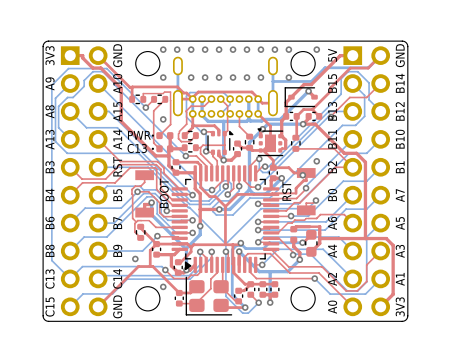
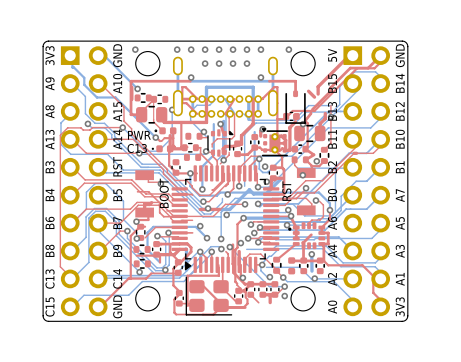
via: none -> (135, 49)
via: (163, 49) -> none
via: (274, 49) -> none
via: (316, 49) -> none
top track: (70, 55) (82, 55) (92, 68) (100, 68) (121, 88) (121, 121) (155, 155) (168, 155) -> none
bottom track: none -> (72, 55) (72, 67) (84, 77) (84, 84) (96, 97) (115, 97) (155, 137)
top track: (98, 55) (129, 87) (177, 86) (192, 98) (198, 92) (251, 92) (262, 103) (272, 103) -> none
bottom track: none -> (100, 55) (104, 55) (137, 88)
top track: (349, 55) (340, 55) (311, 84) (304, 84) (286, 102) (286, 116) (281, 120) (281, 136) -> (349, 55) (318, 86) (318, 94)
bottom track: (380, 55) (368, 67) (325, 67) (311, 81) (272, 81) -> none
top track: none -> (387, 55) (374, 68) (357, 68) (314, 110) (292, 110) (284, 119) (277, 119)
via: none -> (205, 63)
via: none -> (219, 63)
via: none -> (233, 63)
via: none -> (246, 63)
via: (163, 77) -> none
via: (205, 77) -> none
via: (219, 77) -> none
via: (233, 77) -> none
via: (246, 77) -> none
via: (288, 77) -> none
top track: none -> (190, 81) (131, 81) (131, 114) (141, 114)
bottom track: none -> (190, 81) (269, 81)
top track: none -> (269, 81) (295, 81) (295, 93)
bottom track: (70, 83) (55, 98) (55, 141) (67, 153) (138, 153) (189, 204) (209, 204) (225, 186) -> none
bottom track: none -> (72, 83) (85, 96) (85, 113) (95, 123) (104, 123) (114, 133) (114, 136) (142, 164) (162, 164) (199, 201) (203, 201)
bottom track: (98, 83) (204, 190) (212, 190) -> none
top track: none -> (100, 83) (123, 107) (123, 121) (131, 128) (131, 133) (167, 169) (167, 172) (175, 180) (186, 180) (199, 195) (209, 195) (224, 180) (224, 173)
bottom track: (352, 83) (364, 95) (364, 116) (355, 125) (342, 125) (269, 198) (249, 198) (232, 215) (216, 215) (213, 211) (213, 207) (219, 200) (229, 200) (239, 190) (239, 186) -> none
bottom track: none -> (359, 83) (359, 88) (292, 156) (260, 156)
top track: (380, 83) (366, 97) (349, 97) (331, 117) -> none
bottom track: none -> (387, 83) (375, 71) (354, 71) (339, 86) (339, 104) (332, 112) (306, 112) (295, 123) (255, 123) (244, 134) (244, 186)
via: none -> (137, 88)
bottom track: (308, 91) (280, 119) (261, 120) (248, 119) (246, 121) (208, 121) (202, 115) (202, 99) -> none
via: (308, 91) -> none
part footprint: [129, 94, 147, 105] -> [134, 92, 152, 103]
top track: none -> (148, 97) (153, 101) (153, 121) (162, 130)
part: (301, 97) -> none
top track: (143, 99) (143, 93) (170, 92) (170, 100) -> none
top track: (165, 99) (153, 110) (153, 143) (159, 148) -> none
top track: none -> (197, 99) (185, 87) (182, 87) (182, 103) (186, 103) (197, 113)
top track: none -> (206, 99) (206, 122) (164, 122) (161, 114)
bottom track: none -> (206, 99) (206, 87) (253, 87) (253, 99)
top track: (211, 99) (204, 106) (191, 106) (186, 111) (186, 124) (179, 131) (178, 138) (181, 141) (189, 141) (195, 135) -> none
bottom track: none -> (215, 99) (209, 105) (197, 105) (190, 111) (190, 120) (207, 137)
top track: (220, 99) (227, 105) (227, 130) (224, 133) (224, 152) -> none
bottom track: none -> (225, 99) (234, 113)
top track: none -> (234, 99) (225, 113) (229, 117) (229, 133)
top track: none -> (253, 99) (253, 124) (241, 135) (241, 144) (225, 146) (223, 153)
top track: none -> (262, 99) (274, 87) (277, 87) (277, 134) (274, 136) (274, 143) (284, 143)
top track: (170, 100) (170, 124) (159, 135) -> none
top track: none -> (330, 105) (330, 143) (324, 149)
bottom track: none -> (330, 105) (308, 105) (294, 120) (250, 120) (243, 113)
bottom track: (145, 107) (106, 68) (68, 68) (51, 85) (51, 260) (70, 278) (82, 266) (161, 266) (165, 270) -> none
via: (145, 107) -> none
part: none -> (295, 107)
bottom track: none -> (172, 109) (172, 137) (158, 151) (146, 151) (122, 127)
via: none -> (172, 109)
top track: none -> (311, 110) (305, 120) (307, 123) (307, 146) (305, 149) (313, 154) (305, 159) (311, 165) (311, 173)
bottom track: (70, 111) (86, 127) (117, 127) (190, 200) (208, 200) (219, 190) (219, 183) (223, 180) (228, 180) (231, 183) (231, 190) (227, 194) -> none
bottom track: none -> (72, 111) (60, 122) (60, 144) (70, 154) (107, 154) (123, 170) (160, 170) (204, 214) (210, 214) (222, 202) (222, 198)
bottom track: (98, 111) (108, 111) (192, 195) -> none
bottom track: (380, 111) (369, 99) (369, 82) (357, 71) (348, 71) (341, 78) (341, 94) (268, 166) (265, 166) -> none
bottom track: none -> (387, 111) (370, 127) (328, 127) (269, 187) (259, 186)
top track: (192, 113) (192, 127) (184, 135) -> none
bottom track: (220, 113) (230, 104) (230, 99) (223, 92) (190, 92) (186, 96) (186, 117) (201, 131) (206, 134) (206, 151) -> none
bottom track: none -> (225, 113) (225, 151) (217, 160)
top track: none -> (234, 113) (234, 136) (231, 138) (217, 138) (212, 143) (212, 147)
top track: (239, 113) (239, 126) (249, 136) -> none
top track: (258, 113) (270, 126) (270, 143) (263, 150) -> none
top track: none -> (325, 113) (325, 118) (320, 123) (320, 133)
part: none -> (151, 114)
top track: (308, 116) (303, 124) (315, 124) (344, 153) (354, 153) -> (272, 205) (285, 205) (297, 192) (314, 192) (354, 153)
part: (313, 116) -> none
top track: (319, 116) (312, 109) (303, 109) (296, 116) (295, 137) -> none
bottom track: (331, 117) (328, 117) (258, 187) -> none
via: (163, 119) -> none
top track: none -> (295, 121) (289, 127) (289, 150) (284, 150)
top track: none -> (181, 122) (181, 147) (187, 147)
via: none -> (87, 123)
bottom track: none -> (213, 124) (213, 155) (202, 166) (202, 189)
top track: none -> (220, 124) (223, 132)
via: none -> (220, 124)
bottom track: (303, 124) (267, 124) (249, 142) (249, 189) -> none
top track: (192, 125) (214, 125) (218, 132) -> none
top track: none -> (122, 127) (92, 127) (90, 130) (67, 127) (60, 135) (60, 266) (72, 278)
via: none -> (122, 127)
part footprint: [257, 128, 284, 157] -> [261, 128, 288, 157]
top track: none -> (173, 130) (174, 146) (169, 152) (169, 165) (176, 173) (196, 173)
part footprint: [181, 130, 199, 141] -> [185, 132, 203, 140]
top track: (203, 131) (212, 133) -> none
part footprint: [151, 132, 174, 140] -> [154, 127, 177, 135]
bottom track: none -> (254, 132) (254, 169)
part footprint: [244, 133, 255, 151] -> [249, 133, 260, 151]
part: none -> (309, 133)
part footprint: [291, 134, 301, 152] -> [291, 144, 309, 154]
top track: none -> (199, 136) (207, 137)
top track: none -> (155, 137) (160, 141) (164, 138) (173, 138)
via: none -> (155, 137)
bottom track: (70, 139) (58, 127) (58, 106) (67, 97) (73, 97) (84, 86) (84, 80) (93, 71) (102, 71) (185, 156) -> none
top track: none -> (72, 139) (86, 153) (139, 153)
top track: (98, 139) (120, 161) (157, 161) (163, 168) (163, 173) (179, 188) -> none
top track: none -> (100, 139) (133, 139) (163, 169) (163, 174) (178, 188) (181, 188)
bottom track: (352, 139) (306, 188) -> none
top track: none -> (359, 139) (359, 143) (322, 180) (305, 180) (286, 199) (272, 199)
top track: (237, 143) (241, 147) (263, 150) -> none
top track: (224, 145) (203, 145) (200, 147) -> none
top track: (170, 148) (168, 165) (176, 172) (195, 173) (195, 188) (200, 193) (200, 226) -> none
top track: (295, 148) (334, 148) (352, 167) (335, 167) (300, 202) (294, 202) (286, 210) (272, 210) -> none
top track: (263, 150) (273, 160) (273, 167) (274, 167) -> none
top track: none -> (229, 152) (229, 155) (220, 163)
bottom track: none -> (139, 153) (205, 154)
via: none -> (139, 153)
top track: (218, 153) (223, 160) (231, 160) (237, 154) -> none
top track: (356, 153) (365, 162) (365, 238) -> (356, 153) (373, 153) (387, 139)
top track: none -> (241, 154) (247, 154) (254, 147) (260, 147) (262, 149) (274, 149) (282, 157) (283, 194) (272, 194)
part: none -> (324, 155)
top track: (185, 156) (196, 156) (206, 165) (206, 173) -> none
via: (185, 156) -> none
top track: none -> (260, 156) (251, 156) (240, 166) (240, 173)
part: none -> (192, 157)
top track: none -> (294, 159) (294, 165) (297, 168)
part: none -> (300, 159)
top track: none -> (324, 161) (319, 166) (311, 166)
top track: (176, 162) (197, 162) (200, 165) (200, 187) (209, 196) (215, 196) (225, 206) -> none
top track: (265, 166) (262, 166) (255, 173) -> none
top track: (70, 167) (82, 179) (105, 179) (120, 164) (156, 164) (160, 169) (160, 188) (174, 199) -> (72, 167) (85, 179) (131, 179) (145, 193) (168, 193) (174, 199)
bottom track: (98, 167) (141, 167) -> (87, 123) (91, 127) (105, 127) (111, 134) (111, 138) (141, 167)
bottom track: none -> (100, 167) (105, 172) (159, 172) (202, 216) (221, 216)
bottom track: (148, 167) (225, 243) -> (148, 167) (161, 167) (202, 208) (208, 208)
top track: (282, 167) (288, 167) (294, 172) (306, 172) (306, 180) (303, 180) (296, 188) (296, 193) (237, 194) (225, 206) -> none
bottom track: none -> (359, 167) (297, 168)
bottom track: none -> (335, 168) (335, 212) (331, 215) (304, 215) (293, 204) (262, 204) (259, 207)
bottom track: none -> (190, 173) (190, 186) (199, 195) (216, 195) (220, 192) (319, 192) (329, 203) (329, 210)
via: none -> (190, 173)
top track: none -> (229, 173) (229, 180) (209, 201) (203, 201)
top track: none -> (257, 173) (257, 184) (259, 186)
top track: (144, 175) (144, 182) (131, 189) (132, 218) (136, 222) -> (148, 212) (148, 220) (136, 221)
top track: none -> (148, 175) (148, 182) (160, 183)
via position: (281, 178) -> (266, 181)
top track: (244, 181) (250, 187) (258, 187) -> none
bottom track: (356, 181) (343, 181) (308, 216) (291, 216) -> (356, 181) (341, 196) (341, 210) (333, 218) (318, 218) (312, 225) (287, 225)
via: none -> (160, 183)
via: (225, 186) -> none
via: none -> (202, 189)
via: (212, 190) -> none
bottom track: (137, 191) (121, 208) (85, 208) (70, 223) -> none
via: (137, 191) -> none
top track: (70, 195) (82, 182) (115, 182) (130, 167) (155, 167) (156, 189) (174, 205) -> (72, 195) (84, 183) (131, 183) (144, 196) (165, 196) (174, 205)
bottom track: (98, 195) (107, 186) (139, 186) (143, 189) (156, 189) (166, 200) (166, 210) -> none
via: (192, 195) -> none
top track: none -> (299, 198) (306, 198) (311, 203) (311, 211)
bottom track: none -> (299, 198) (235, 198) (221, 212) (221, 239)
top track: (315, 200) (313, 203) (306, 203) (306, 210) -> none
bottom track: (315, 200) (307, 208) (261, 208) (225, 243) -> none
via: none -> (203, 201)
top track: none -> (319, 201) (323, 205) (323, 216) (319, 220) (311, 220) (309, 225)
bottom track: (151, 202) (151, 214) (185, 248) (200, 234) (200, 226) -> none
via: (151, 202) -> none
top track: (258, 203) (271, 205) -> none
top track: none -> (245, 204) (225, 204) (213, 216) (173, 216) (159, 202) (137, 202) (130, 209) (86, 209) (72, 223)
via: none -> (245, 204)
top track: (225, 206) (225, 244) -> none
via: none -> (208, 208)
via: (219, 209) -> none
via: (166, 210) -> none
bottom track: none -> (288, 210) (285, 212) (229, 212) (226, 214)
via: none -> (288, 210)
top track: none -> (329, 210) (329, 219) (321, 227) (321, 232) (328, 232) (328, 243) (321, 243) (323, 246) (323, 260)
via: none -> (329, 210)
via: none -> (226, 214)
top track: none -> (243, 218) (237, 224) (235, 281) (241, 291) (245, 292) (245, 297)
bottom track: none -> (243, 218) (291, 218)
via: none -> (243, 218)
top track: none -> (291, 218) (296, 227) (296, 238) (296, 232)
top track: none -> (182, 220) (174, 221) (158, 205) (138, 205) (120, 223) (100, 223)
bottom track: (192, 220) (167, 220) (161, 213) (161, 199) (155, 193) (143, 193) (114, 223) (98, 223) -> none
via: (192, 220) -> none
via: none -> (136, 221)
top track: none -> (258, 221) (253, 221) (250, 224)
via: (258, 221) -> none
bottom track: none -> (72, 223) (86, 209) (86, 192) (95, 183) (105, 183) (123, 201) (123, 219) (136, 232) (136, 238)
bottom track: none -> (100, 223) (100, 232) (139, 272)
top track: (352, 223) (344, 214) (320, 214) (316, 218) (294, 220) (291, 223) (287, 223) (278, 232) (272, 232) -> none
bottom track: (380, 223) (366, 237) (366, 281) (357, 290) (347, 290) (310, 254) (293, 255) -> none
bottom track: none -> (387, 223) (371, 238) (248, 238)
via: none -> (250, 224)
via: none -> (287, 225)
top track: (140, 226) (156, 244) (150, 250) (150, 266) -> none
top track: none -> (145, 226) (140, 226) (130, 235) (130, 278)
top track: (155, 227) (149, 220) (137, 220) (134, 223) (134, 232) (140, 237) -> (155, 227) (145, 237)
via: none -> (260, 227)
drawing: none -> [288, 227, 292, 231]
top track: (293, 229) (296, 226) (319, 226) (319, 243) (311, 251) -> none
via: (258, 230) -> none
top track: none -> (127, 231) (120, 231) (100, 251)
bottom track: none -> (127, 231) (127, 238) (156, 267) (162, 267) (165, 264) (165, 241) (160, 235)
via: none -> (127, 231)
bottom track: none -> (168, 232) (169, 264) (163, 270) (155, 270) (119, 234) (119, 221) (106, 208) (94, 208) (86, 216) (86, 237) (72, 251)
via: none -> (168, 232)
bottom track: (192, 232) (176, 232) (157, 213) (157, 200) (153, 196) (147, 196) (106, 237) (84, 237) (70, 251) -> none
via: (192, 232) -> none
via: none -> (254, 233)
part position: (293, 234) -> (291, 265)
part: none -> (309, 235)
bottom track: (157, 236) (142, 251) (98, 251) -> none
via: none -> (136, 238)
bottom track: none -> (207, 238) (195, 226) (153, 226) (147, 232) (147, 249) (160, 262)
via: none -> (207, 238)
via: none -> (248, 238)
top track: (271, 238) (279, 238) (293, 252) (293, 255) -> none
top track: none -> (272, 238) (260, 236) (258, 238) (248, 238)
top track: (319, 238) (386, 238) (393, 245) (393, 294) (380, 306) -> none
via: none -> (221, 239)
top track: (293, 239) (293, 246) (299, 252) (299, 259) -> none
bottom track: (302, 242) (269, 242) (263, 248) (245, 248) (242, 245) (236, 245) (232, 249) (232, 294) (245, 307) -> none
via: (302, 242) -> none
bottom track: (225, 243) (225, 296) (242, 313) (248, 313) (258, 302) -> none
top track: (240, 243) (239, 244) (193, 244) (191, 247) -> none
top track: none -> (296, 243) (276, 260)
part: (311, 243) -> none
top track: none -> (170, 244) (170, 252) (179, 262) (173, 268) (173, 285) (180, 292) (174, 299) (174, 312) (176, 314) (202, 314)
top track: none -> (303, 245) (303, 260)
bottom track: none -> (229, 247) (269, 286) (284, 286)
via: none -> (229, 247)
part: none -> (142, 249)
bottom track: none -> (221, 249) (218, 246) (211, 246) (179, 278) (100, 278)
via: none -> (221, 249)
bottom track: none -> (246, 249) (272, 249) (276, 245) (326, 245) (343, 262) (375, 262) (387, 251)
top track: (271, 249) (288, 266) (322, 266) (346, 290) (357, 290) (366, 281) (366, 264) (380, 251) -> none
bottom track: none -> (199, 250) (176, 273) (154, 273) (116, 235) (116, 222) (105, 211) (95, 211) (88, 218) (88, 262) (72, 278)
bottom track: (211, 251) (211, 257) (190, 279) (127, 279) (112, 293) (83, 293) (70, 306) -> none
via: (225, 251) -> none
bottom track: (239, 251) (259, 271) (287, 271) (299, 259) -> none
via: (239, 251) -> none
bottom track: none -> (213, 252) (183, 281) (142, 281) (128, 295) (83, 295) (72, 306)
top track: (171, 254) (171, 265) (178, 272) (190, 270) (195, 264) -> none
bottom track: none -> (311, 254) (311, 271)
via: none -> (311, 254)
top track: none -> (136, 255) (160, 255) (160, 262)
via: (293, 255) -> none
via: (135, 258) -> none
via: (299, 259) -> none
top track: none -> (291, 260) (323, 260)
top track: none -> (323, 260) (328, 265) (362, 265) (373, 276) (373, 292) (387, 306)
part: none -> (142, 263)
top track: (200, 264) (200, 271) (187, 278) (173, 278) (165, 270) -> none
top track: (217, 264) (217, 272) (210, 279) (210, 288) (195, 303) -> none
top track: none -> (218, 264) (218, 275) (187, 275) (187, 305) (198, 305)
top track: none -> (240, 264) (240, 275) (242, 277)
top track: (244, 264) (244, 256) (247, 253) (270, 253) (289, 273) (318, 273) (352, 306) -> none
top track: none -> (246, 264) (246, 257) (249, 254) (260, 254) (283, 277)
top track: (250, 264) (250, 272) (256, 278) (314, 278) -> none
bottom track: (262, 264) (277, 249) (323, 249) (352, 278) -> none
part: none -> (276, 265)
part: none -> (303, 265)
part: none -> (320, 265)
bottom track: none -> (266, 267) (299, 267) (311, 278) (359, 278)
via: (186, 270) -> none
bottom track: (270, 271) (270, 302) -> none
via: none -> (139, 272)
top track: none -> (173, 273) (151, 273) (146, 278) (128, 278) (100, 306)
via: none -> (242, 277)
bottom track: none -> (269, 277) (267, 277) (260, 270) (260, 264) (278, 248) (322, 248) (340, 266) (375, 266) (387, 278)
via: none -> (269, 277)
bottom track: none -> (283, 277) (287, 281) (334, 281) (359, 306)
via: none -> (283, 277)
bottom track: (314, 278) (330, 294) (365, 294) (380, 278) -> none
via: (163, 286) -> none
top track: (196, 286) (190, 292) (179, 292) (152, 266) (138, 266) (98, 306) -> none
top track: none -> (198, 286) (204, 286) (224, 307) (244, 307) (247, 303) (245, 297)
top track: none -> (284, 286) (276, 294)
via: none -> (284, 286)
via: none -> (284, 296)
via: (258, 302) -> none
via: (270, 302) -> none
top track: none -> (222, 305) (213, 314) (203, 314)
via: (245, 307) -> none

